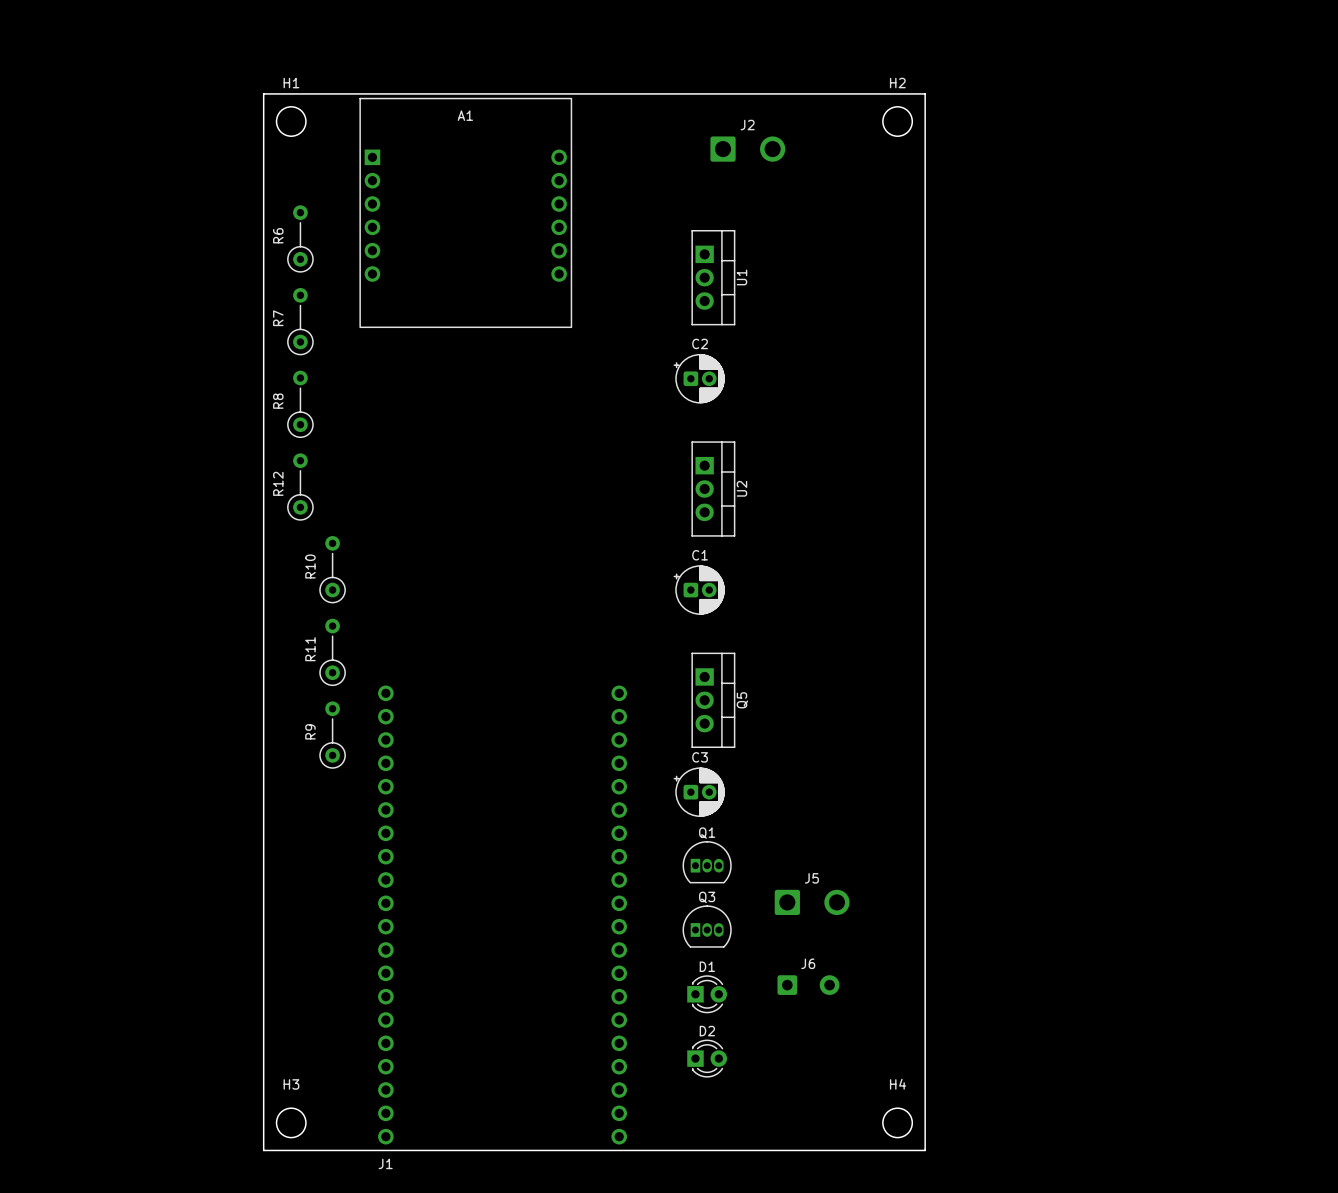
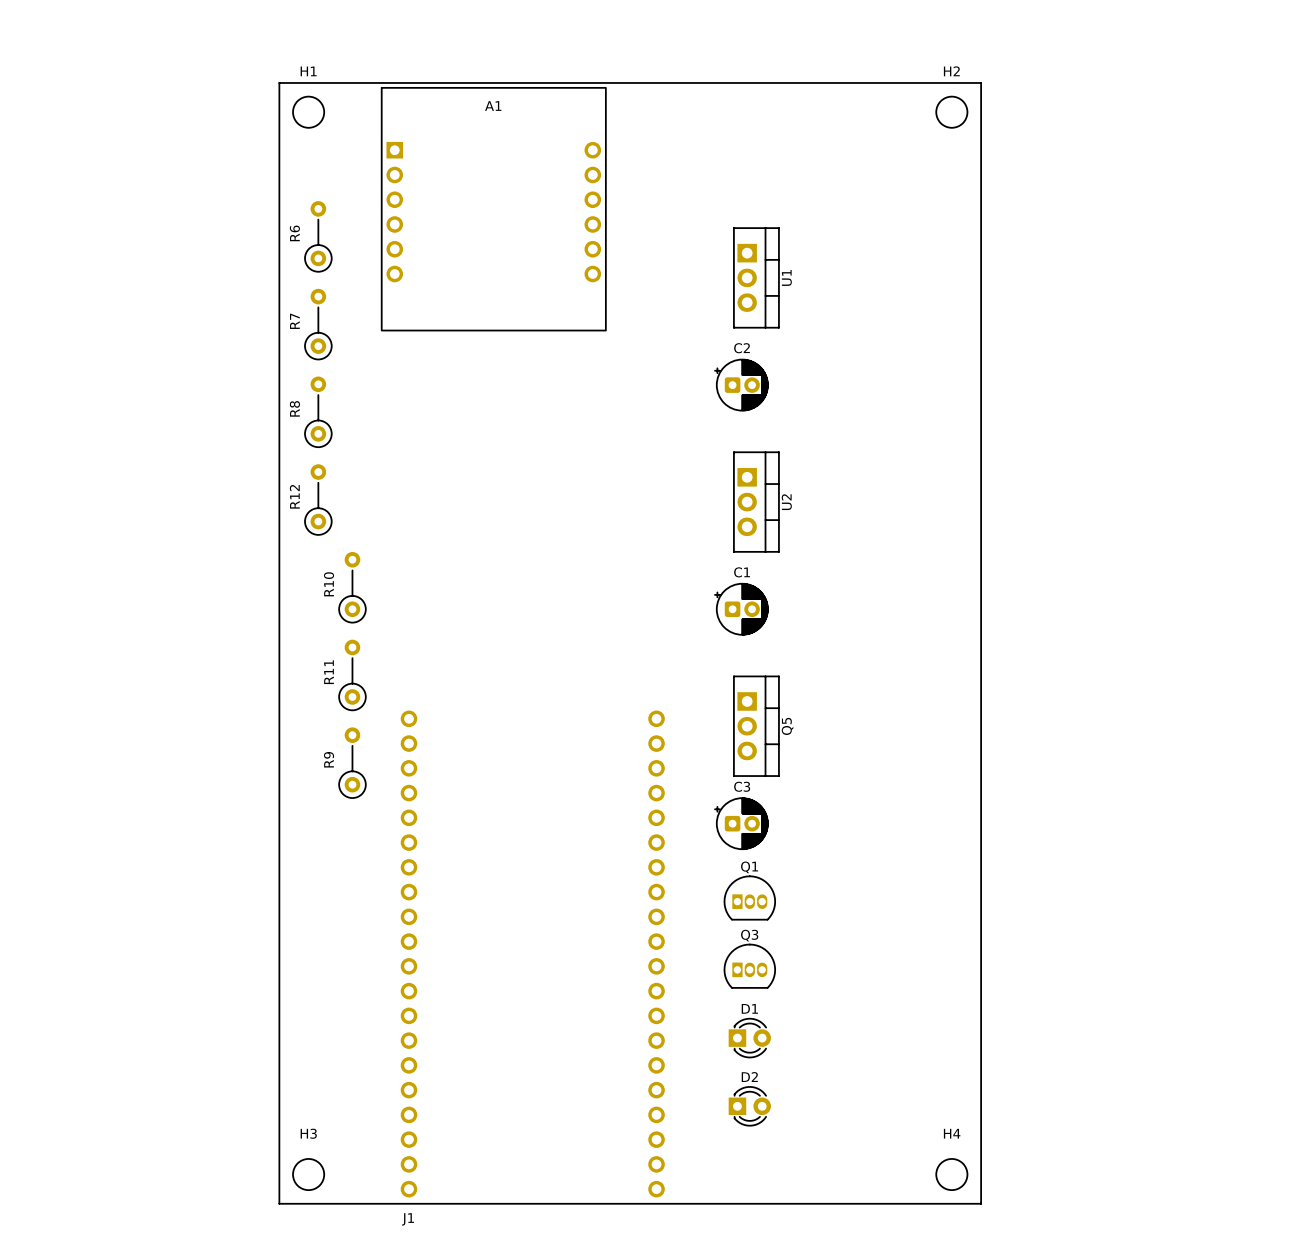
J2: (747, 149) -> none
J5: (812, 902) -> none
J6: (808, 985) -> none

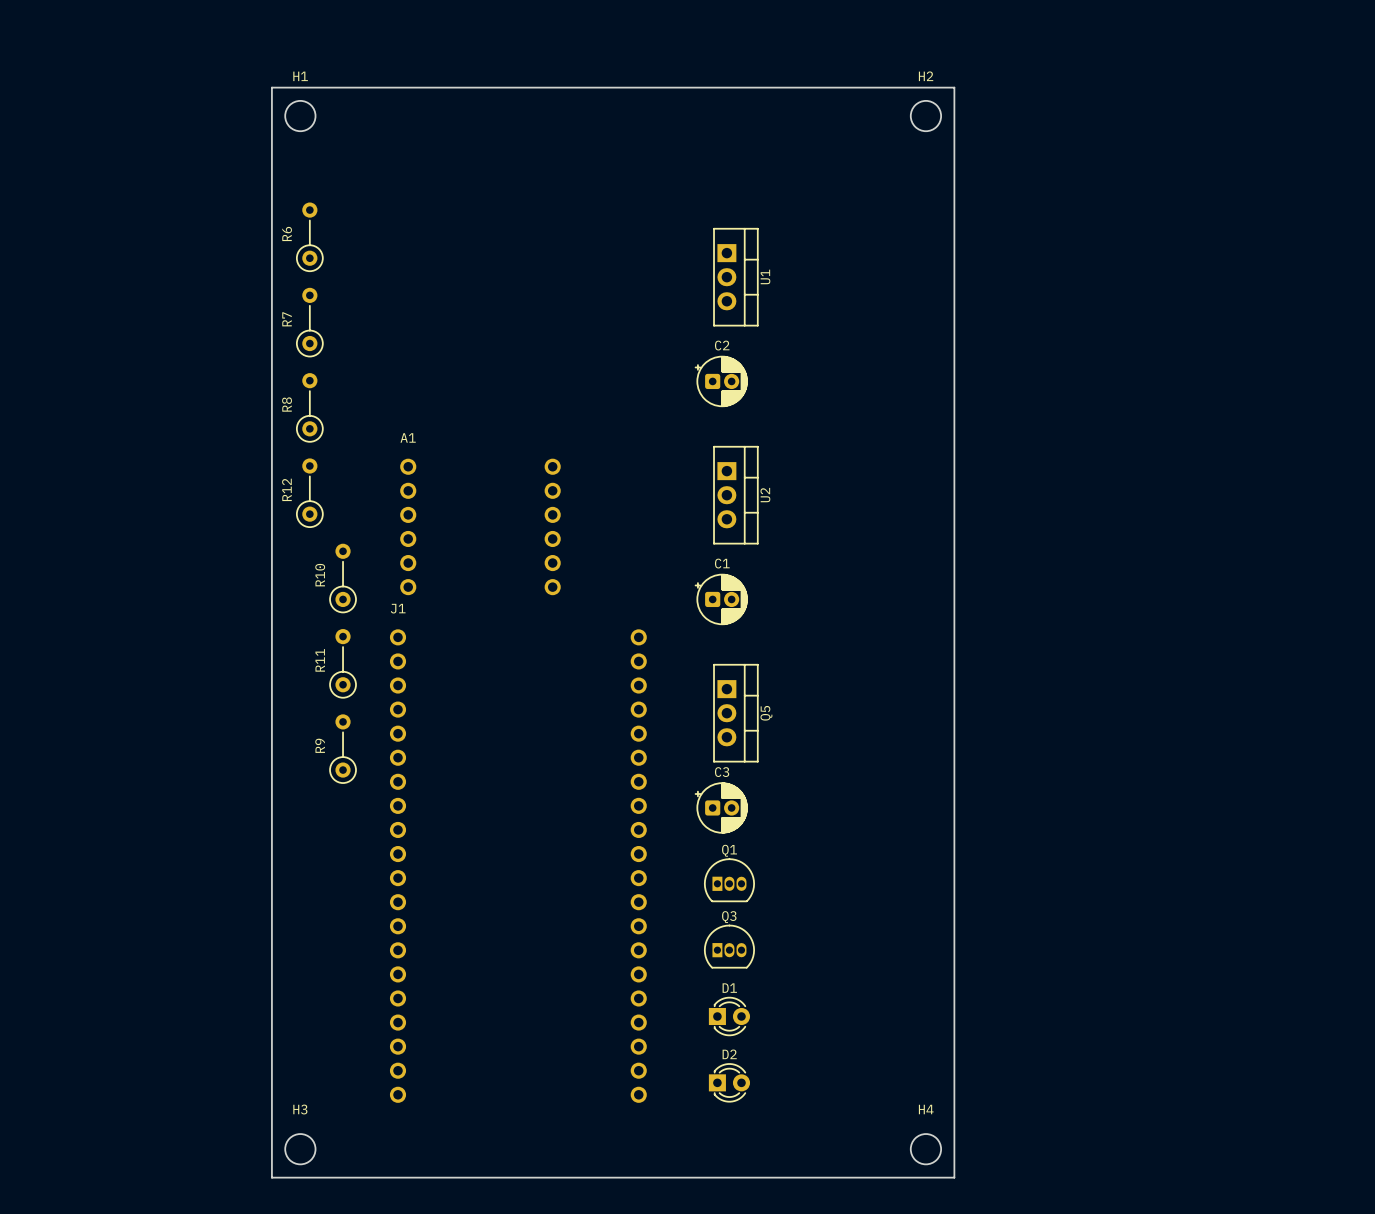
A1 footprint: [381, 87, 607, 332] -> [400, 458, 561, 596]
A1 name position: A1 (493, 106) -> A1 (408, 437)
J1 position: (532, 953) -> (518, 866)
J1 name position: J1 (408, 1219) -> J1 (398, 608)

